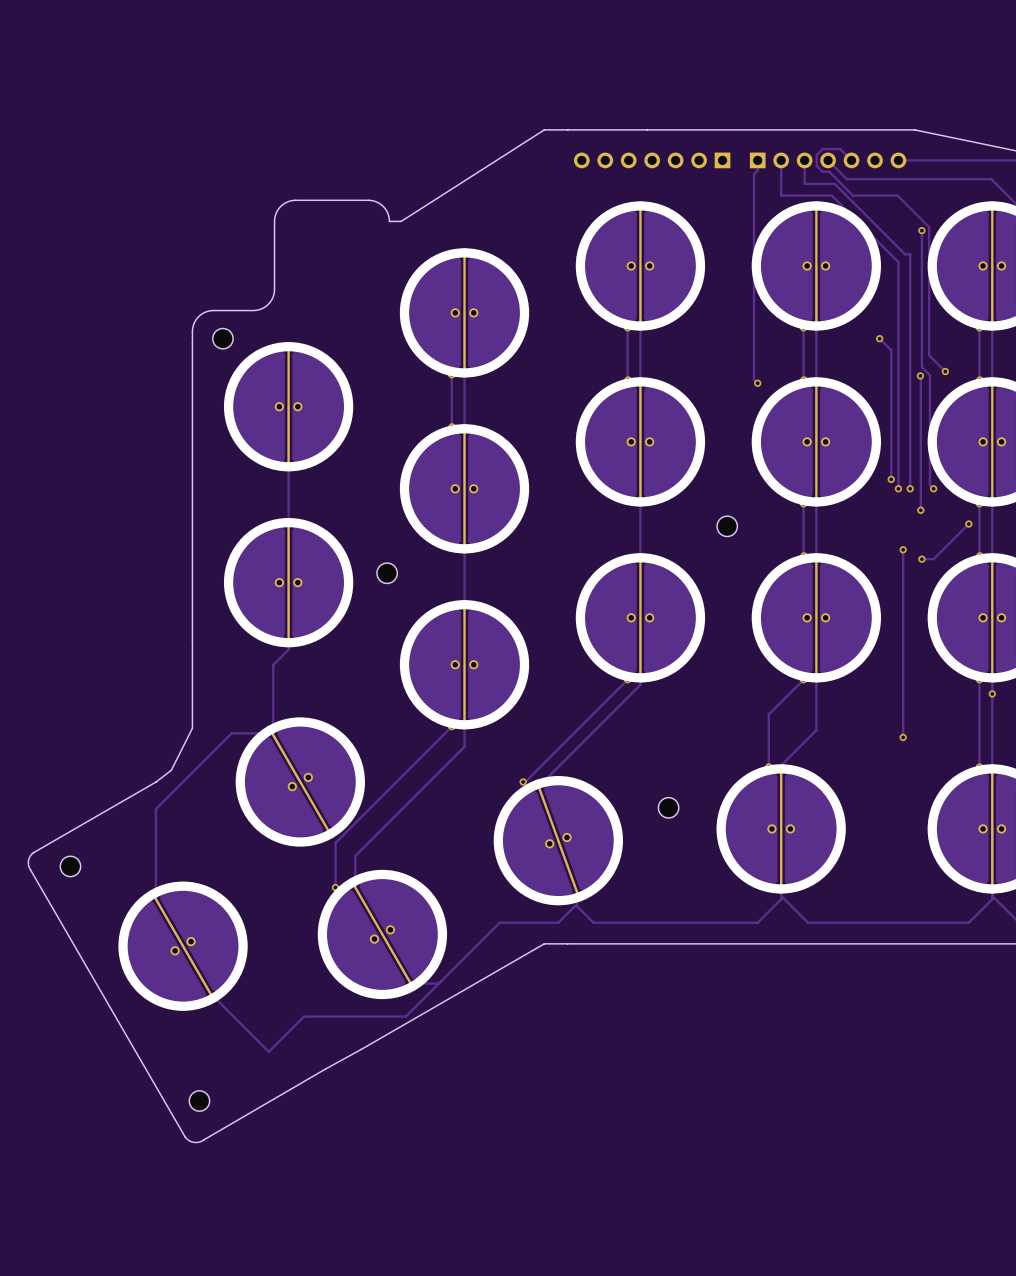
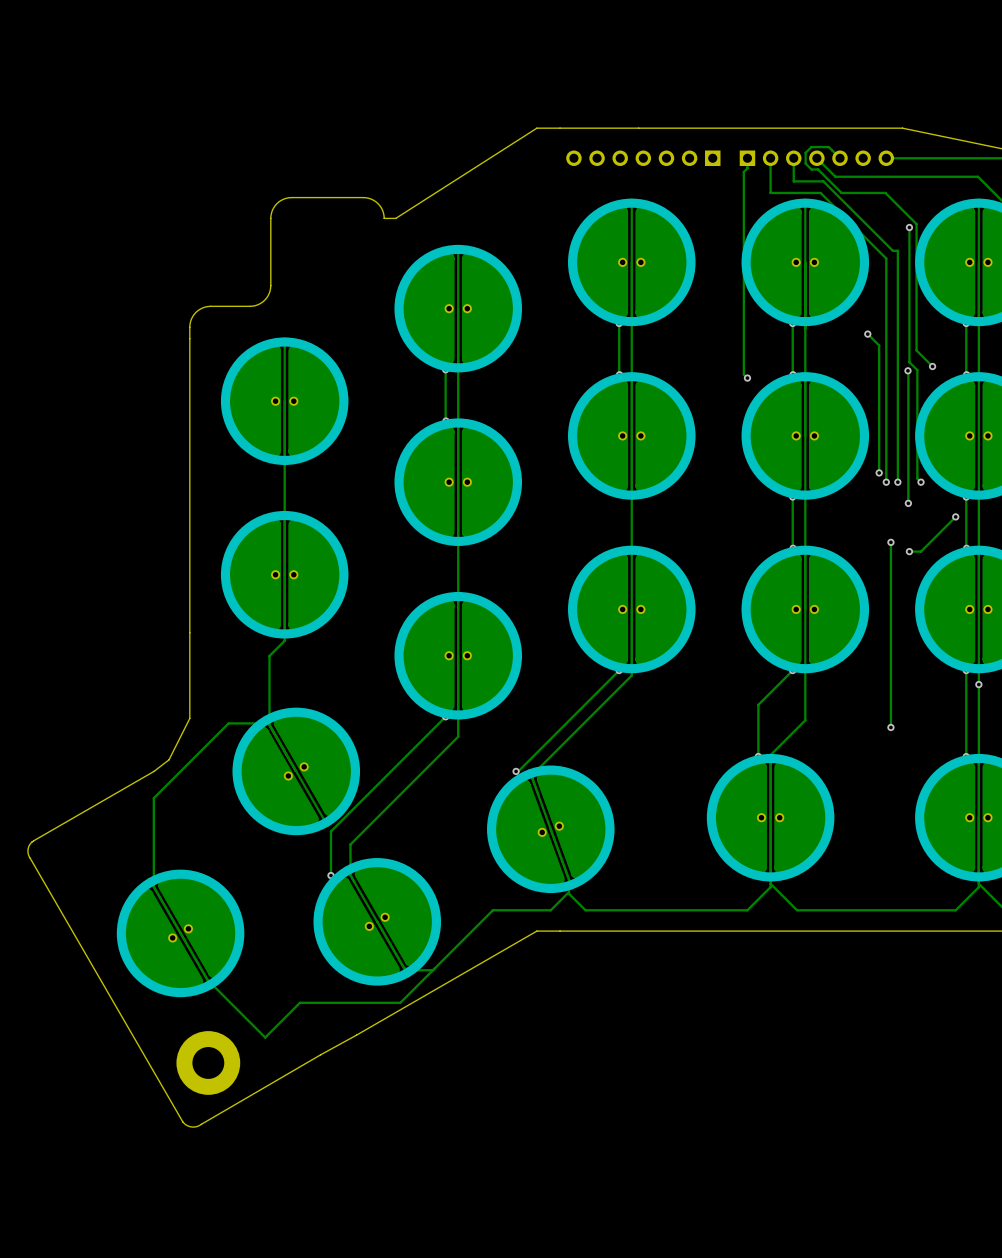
part: (222, 338) -> none
part: (727, 526) -> none
part: (387, 573) -> none
part: (668, 807) -> none
part: (70, 866) -> none
part: none -> (208, 1062)
part: (199, 1101) -> none

